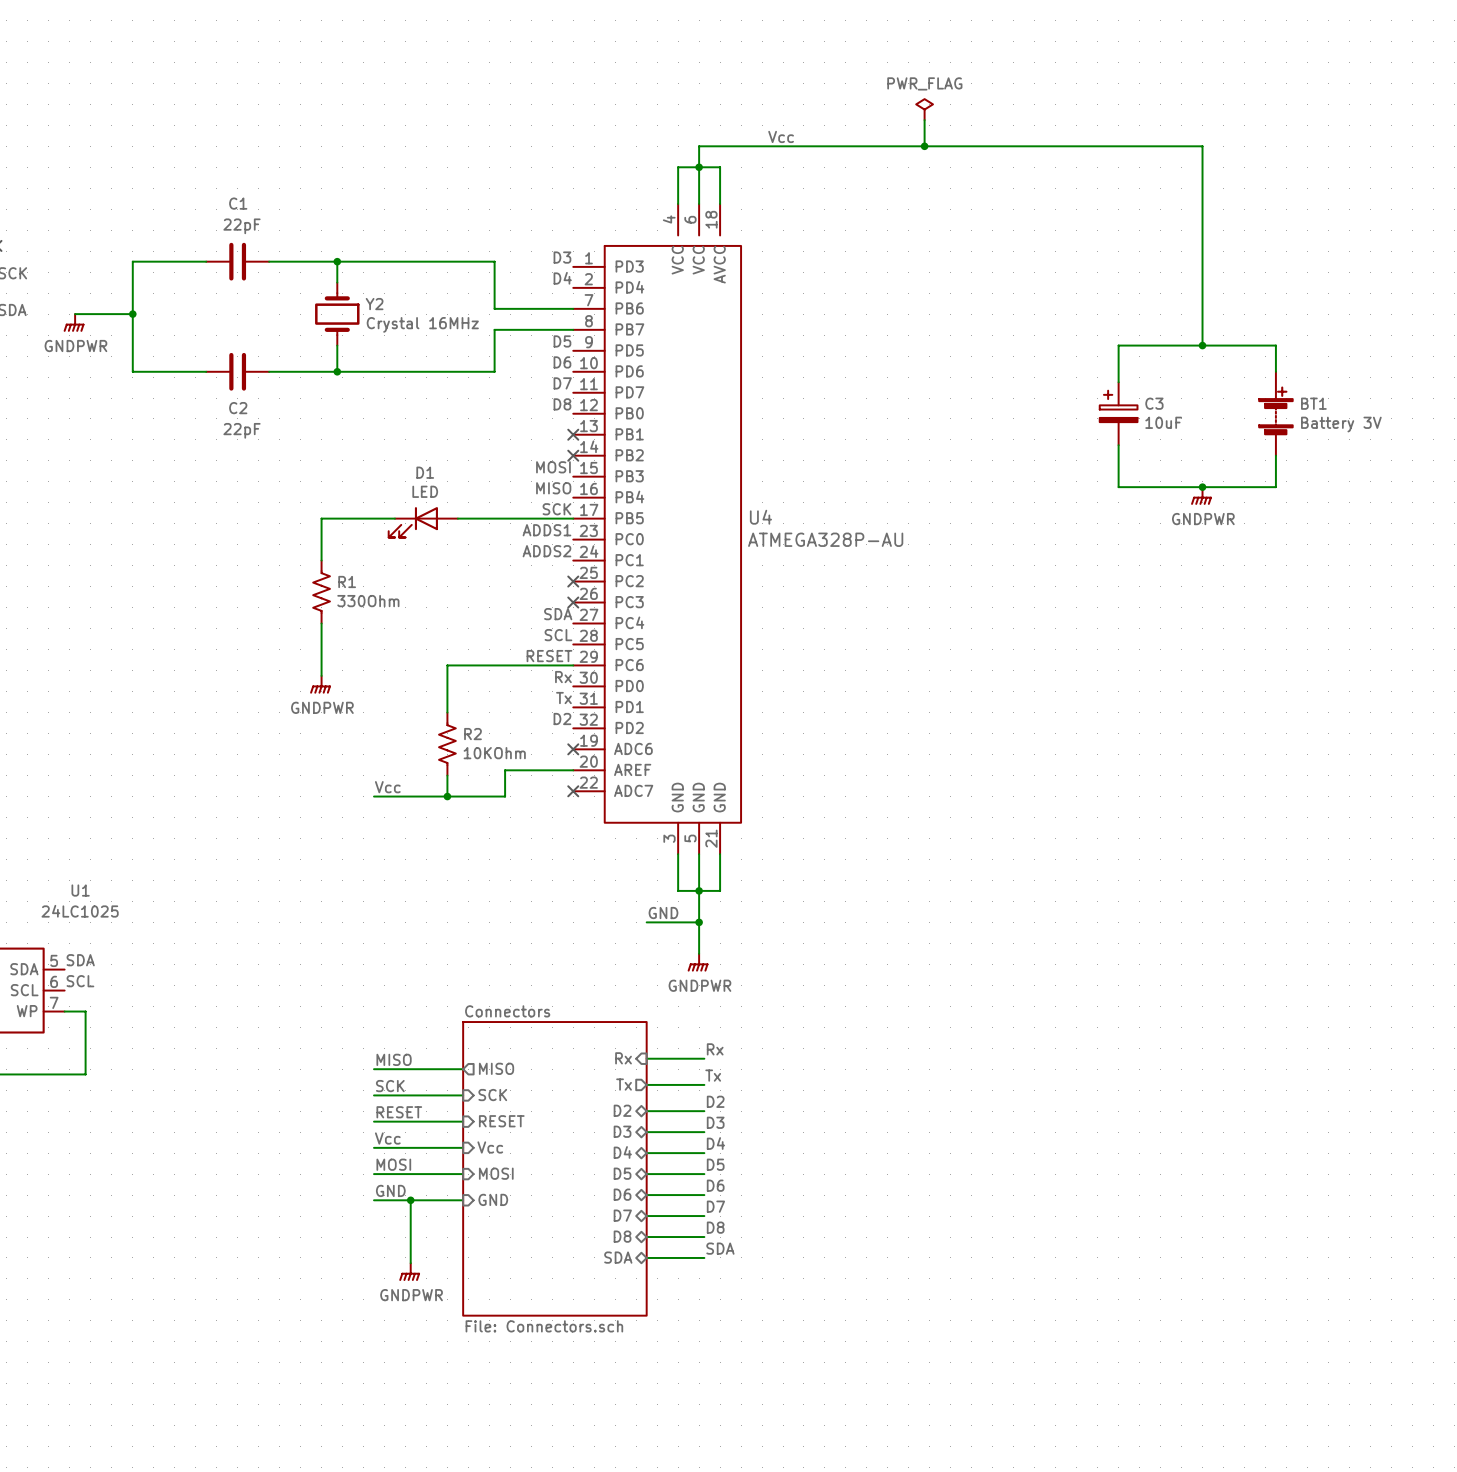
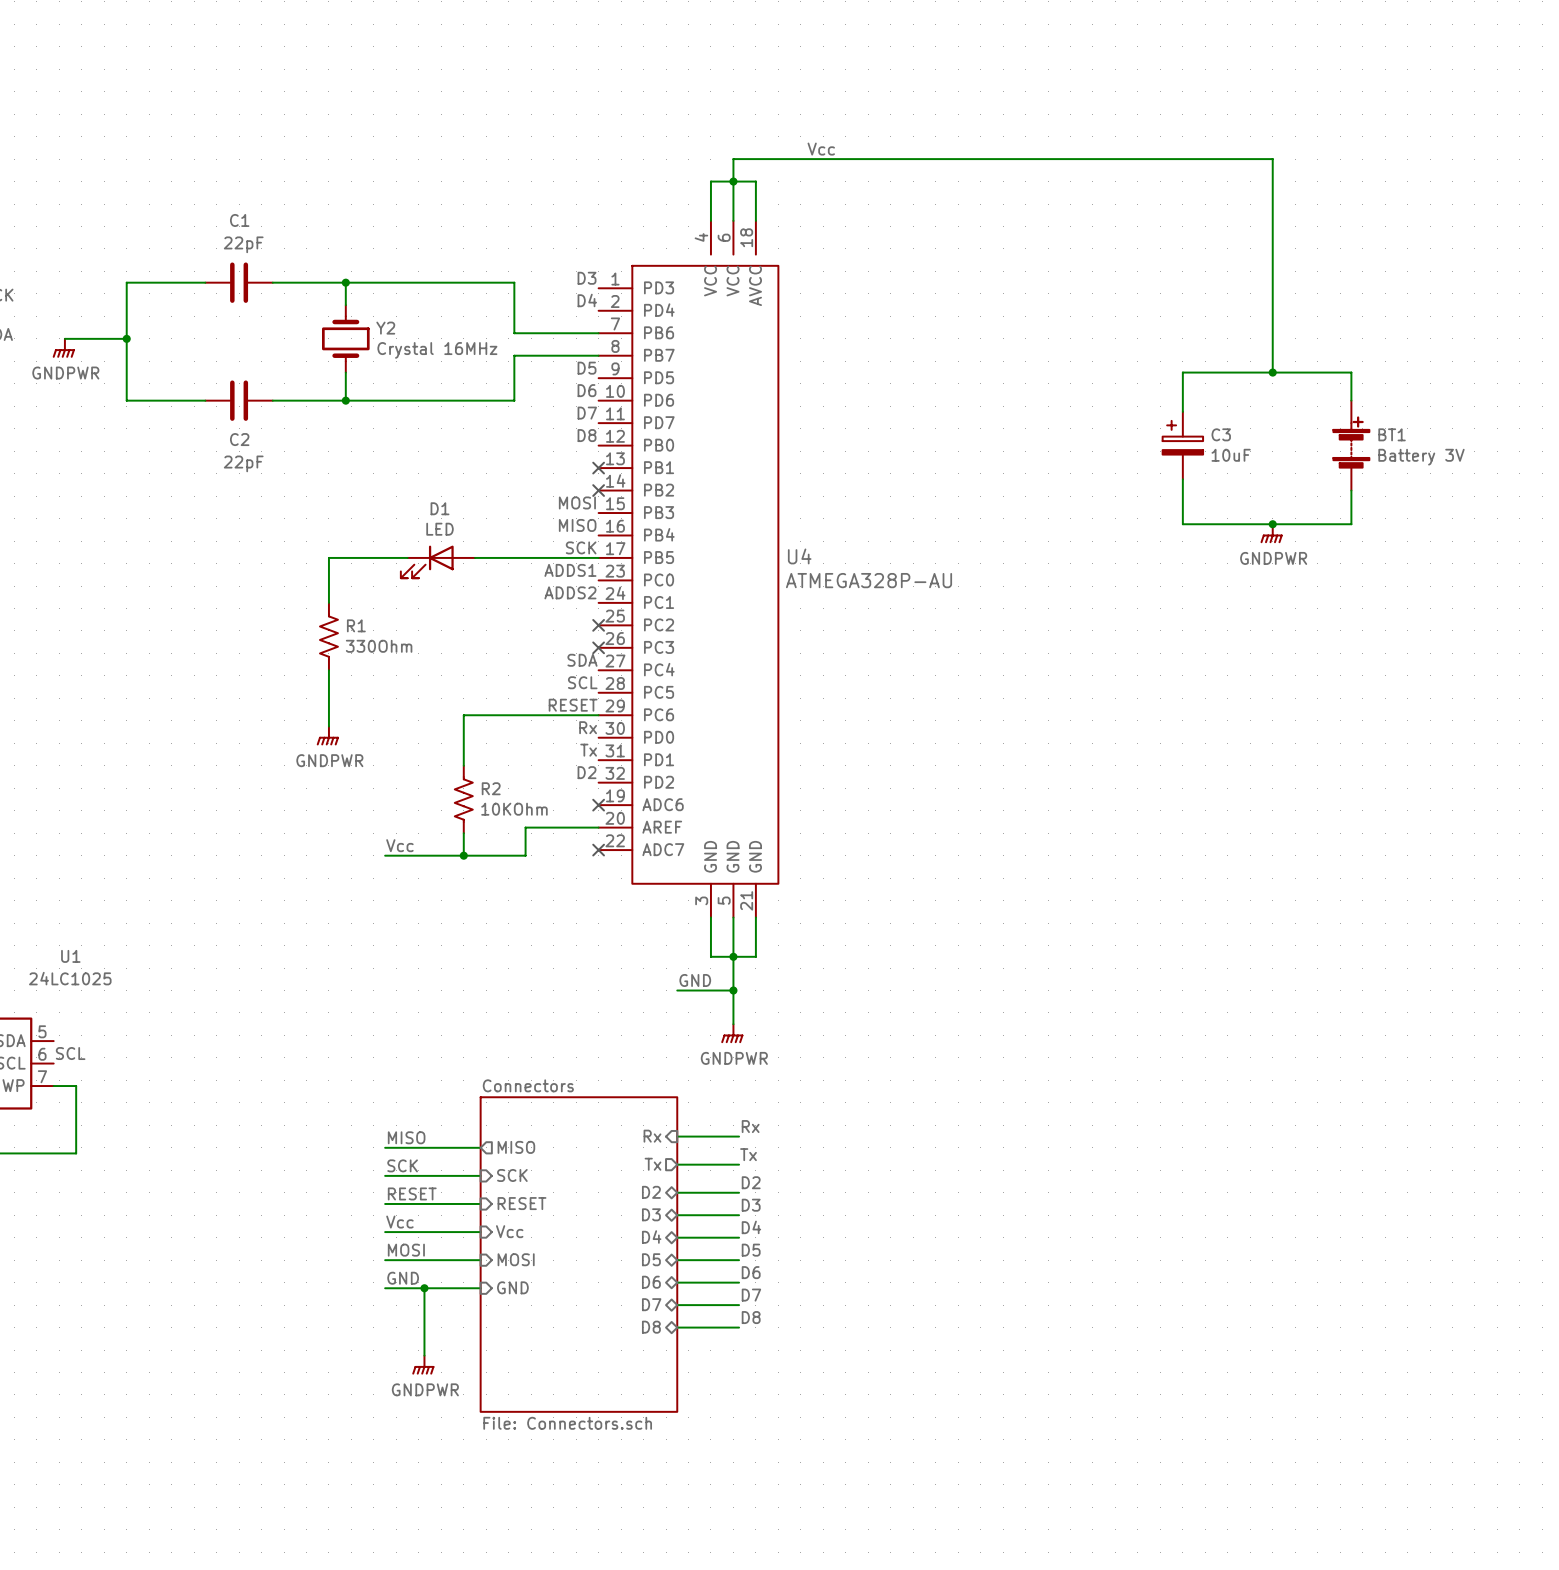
power symbol: PWR_FLAG (924, 109) -> none
wire: (924, 120) (924, 146) -> none
junction: (924, 146) -> none
label: SDA (80, 960) -> none
label: SDA (720, 1248) -> none
sheet pin: SDA (618, 1257) -> none
wire: (646, 1257) (704, 1257) -> none

